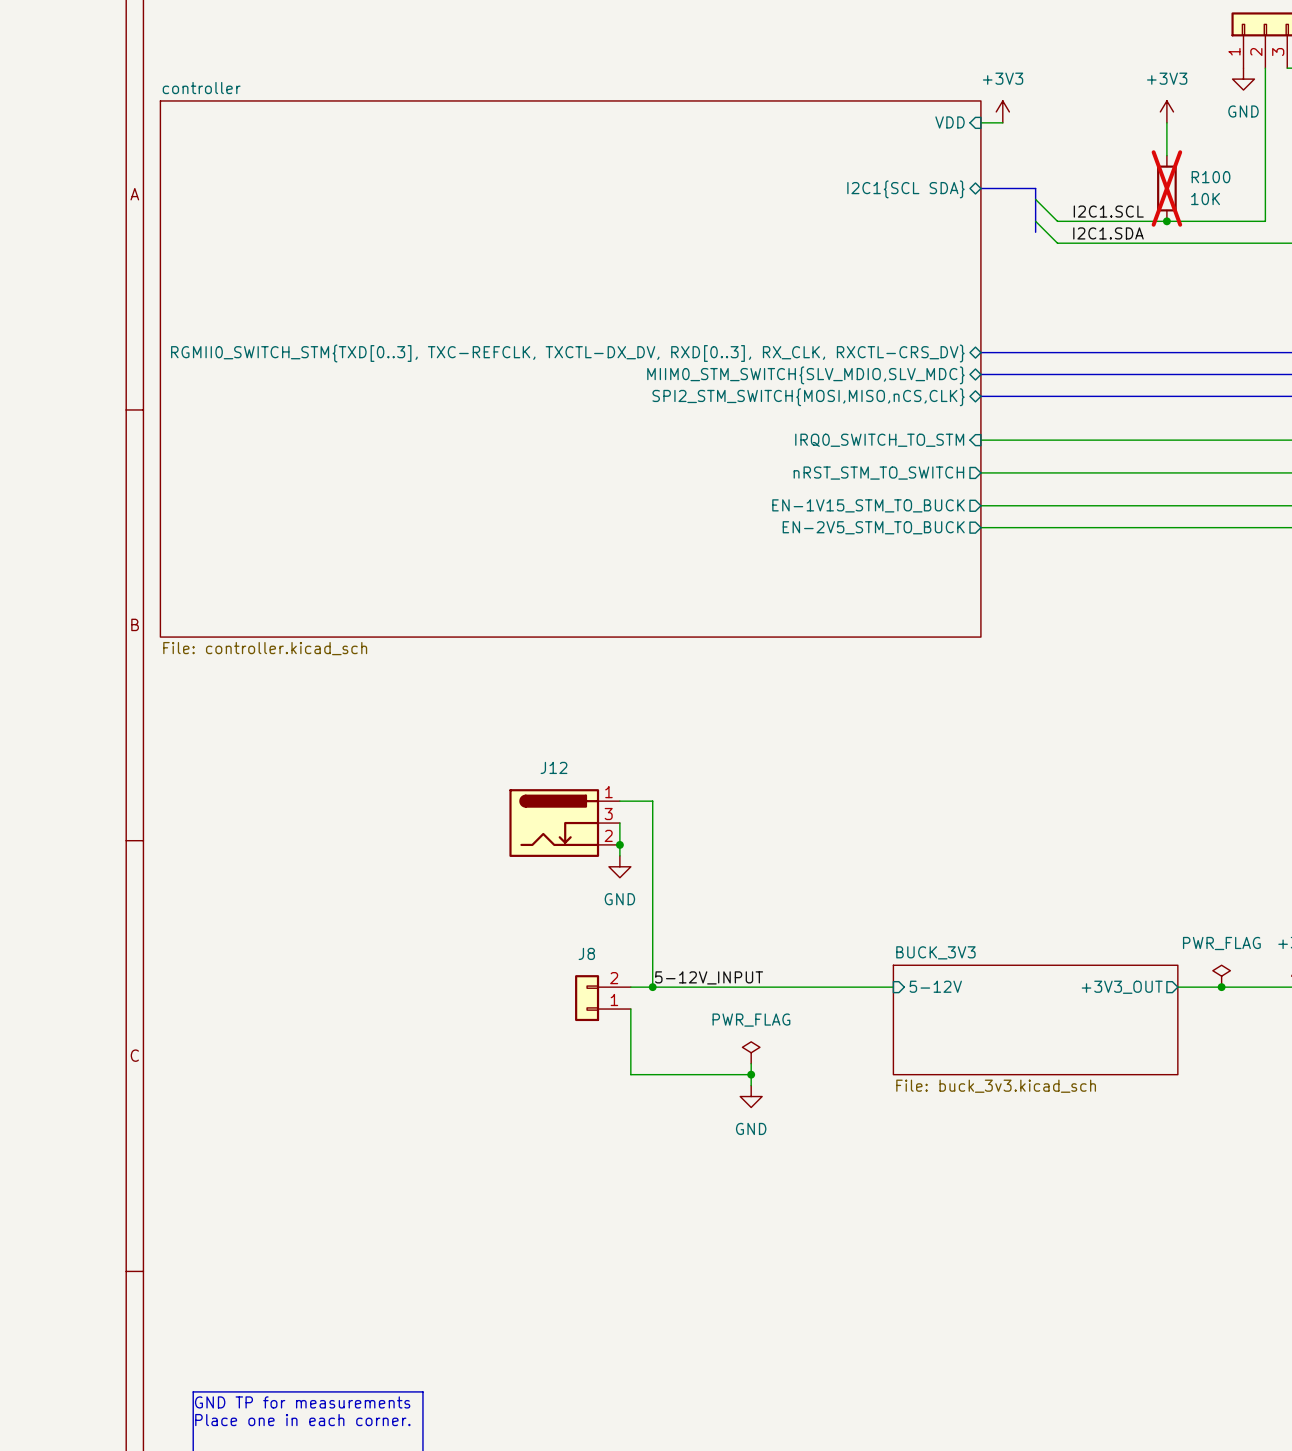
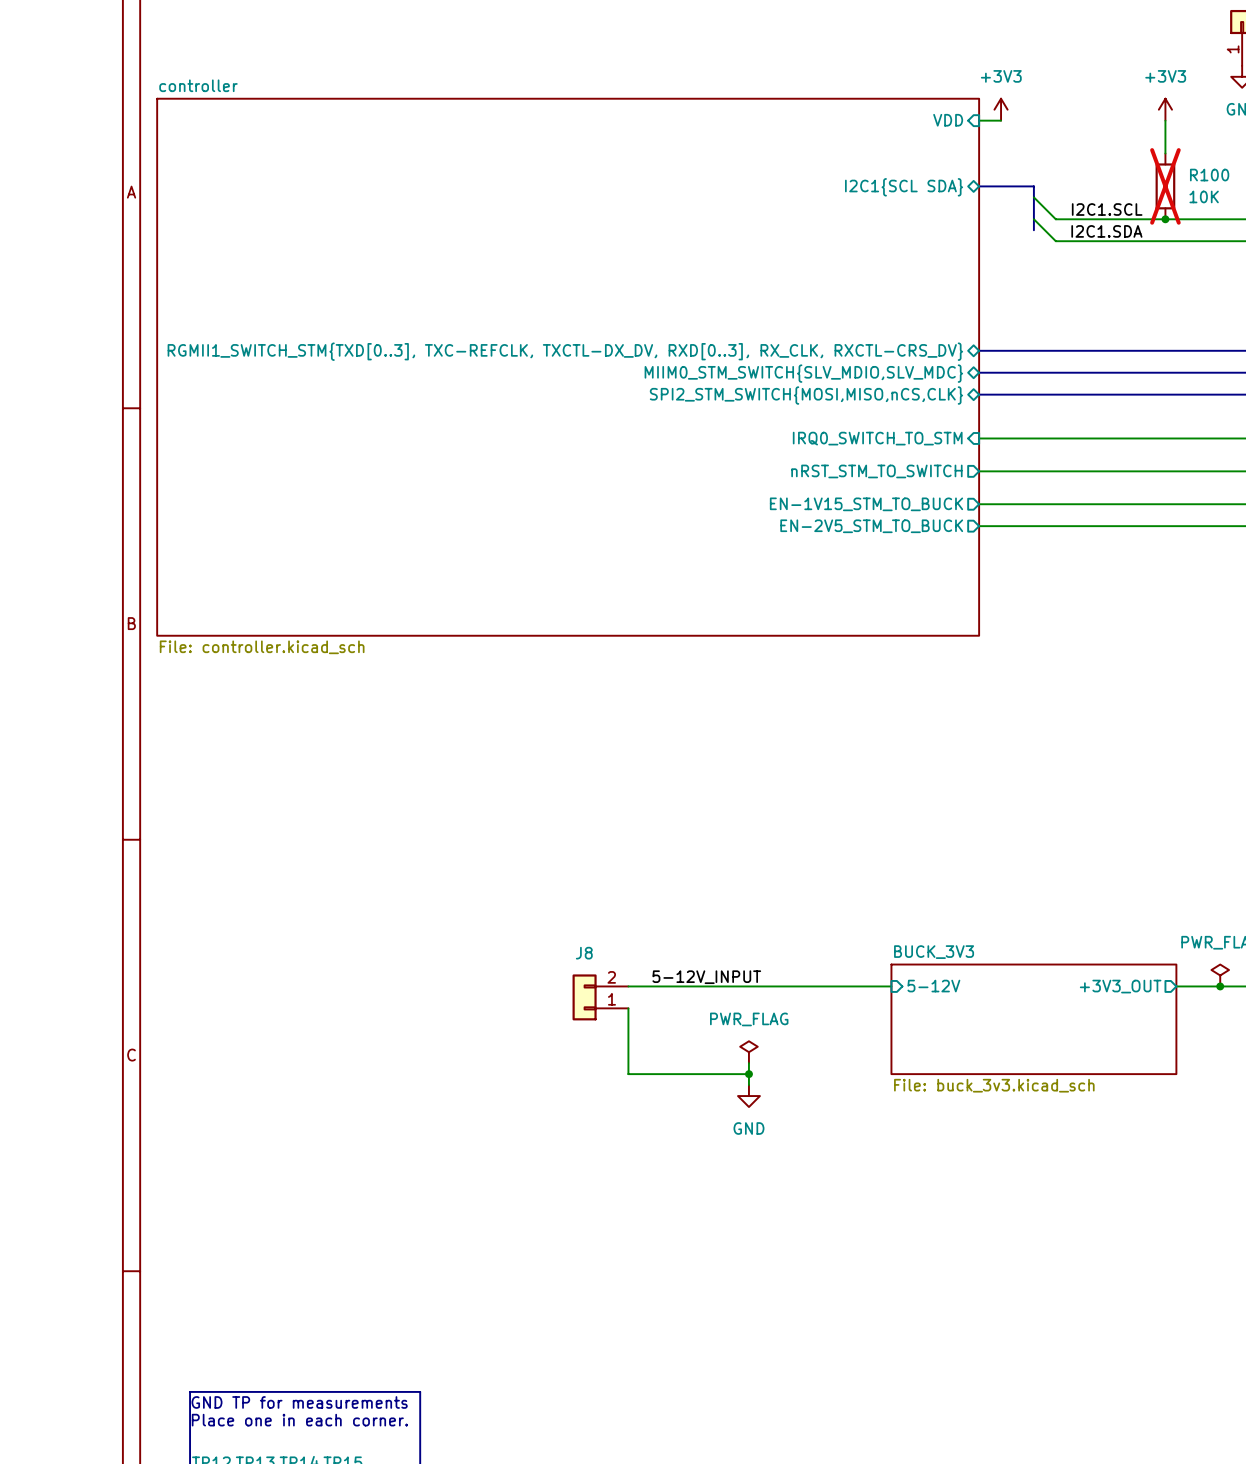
sheet pin: RGMII0_SWITCH_STM{TXD[0..3], TXC-REFCLK, TXCTL-DX_DV, RXD[0..3], RX_CLK, RXCTL-CRS_DV} (567, 353) -> RGMII1_SWITCH_STM{TXD[0..3], TXC-REFCLK, TXCTL-DX_DV, RXD[0..3], RX_CLK, RXCTL-CRS_DV} (565, 351)
wire: (619, 801) (652, 801) (652, 987) -> none
J12: (564, 823) -> none
wire: (619, 823) (619, 855) -> none
junction: (619, 844) -> none
power symbol: GND (619, 866) -> none
junction: (652, 987) -> none

